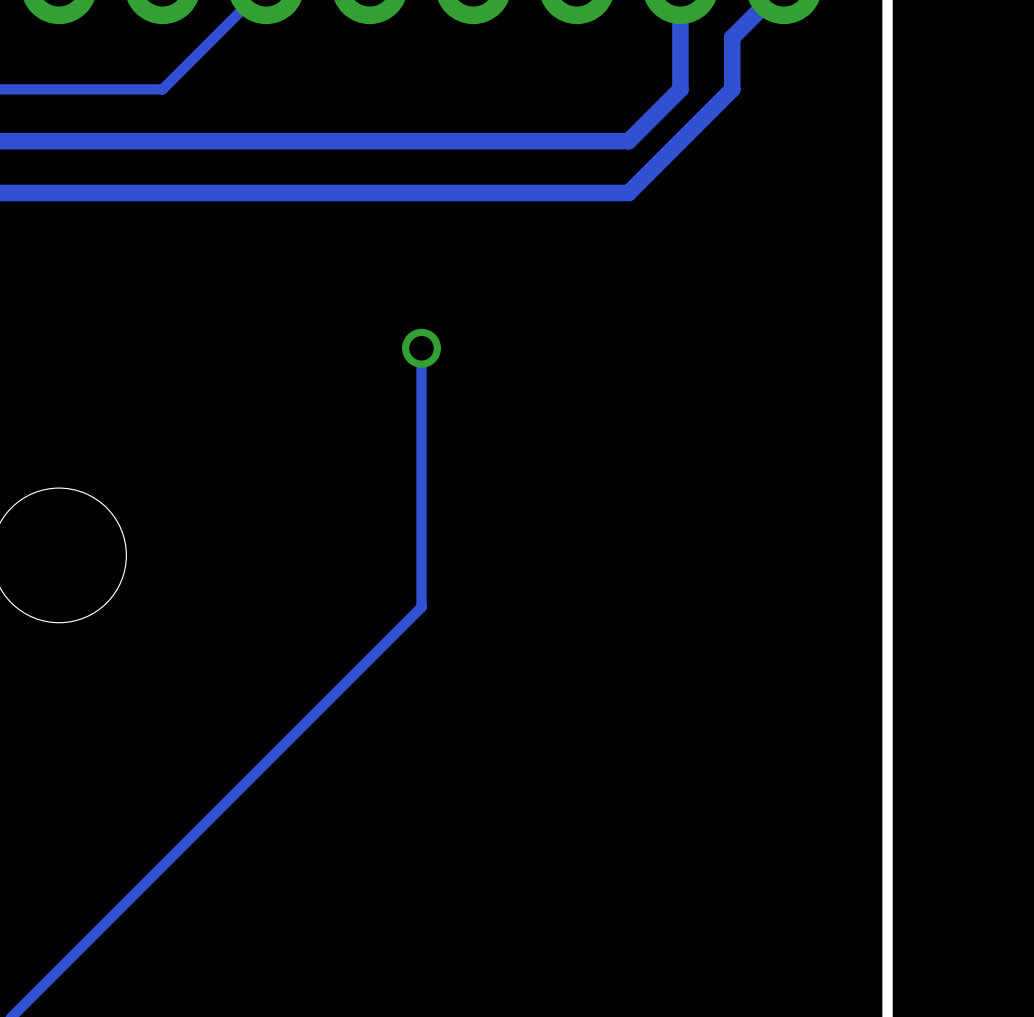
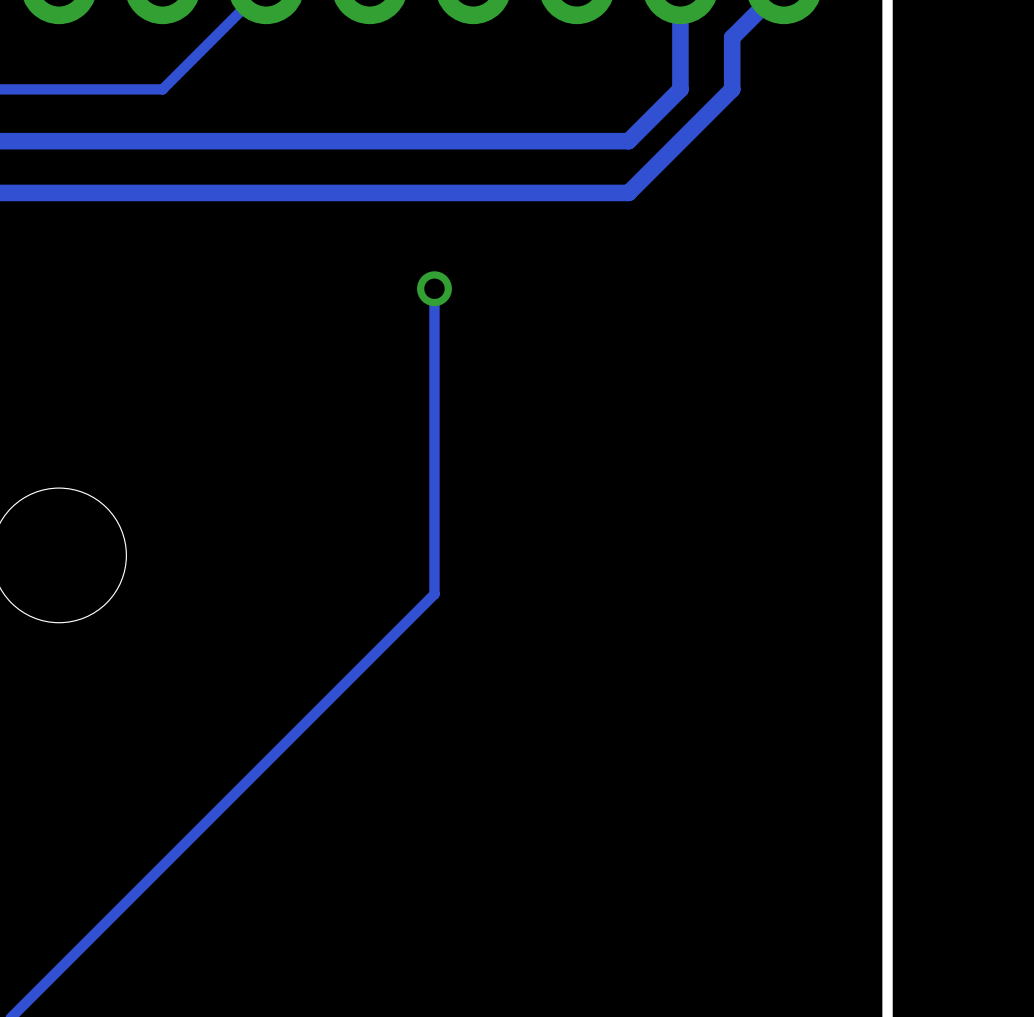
via: none -> (434, 288)
track: (421, 348) (421, 607) -> (434, 288) (434, 594) (421, 607)
via: (421, 348) -> none

